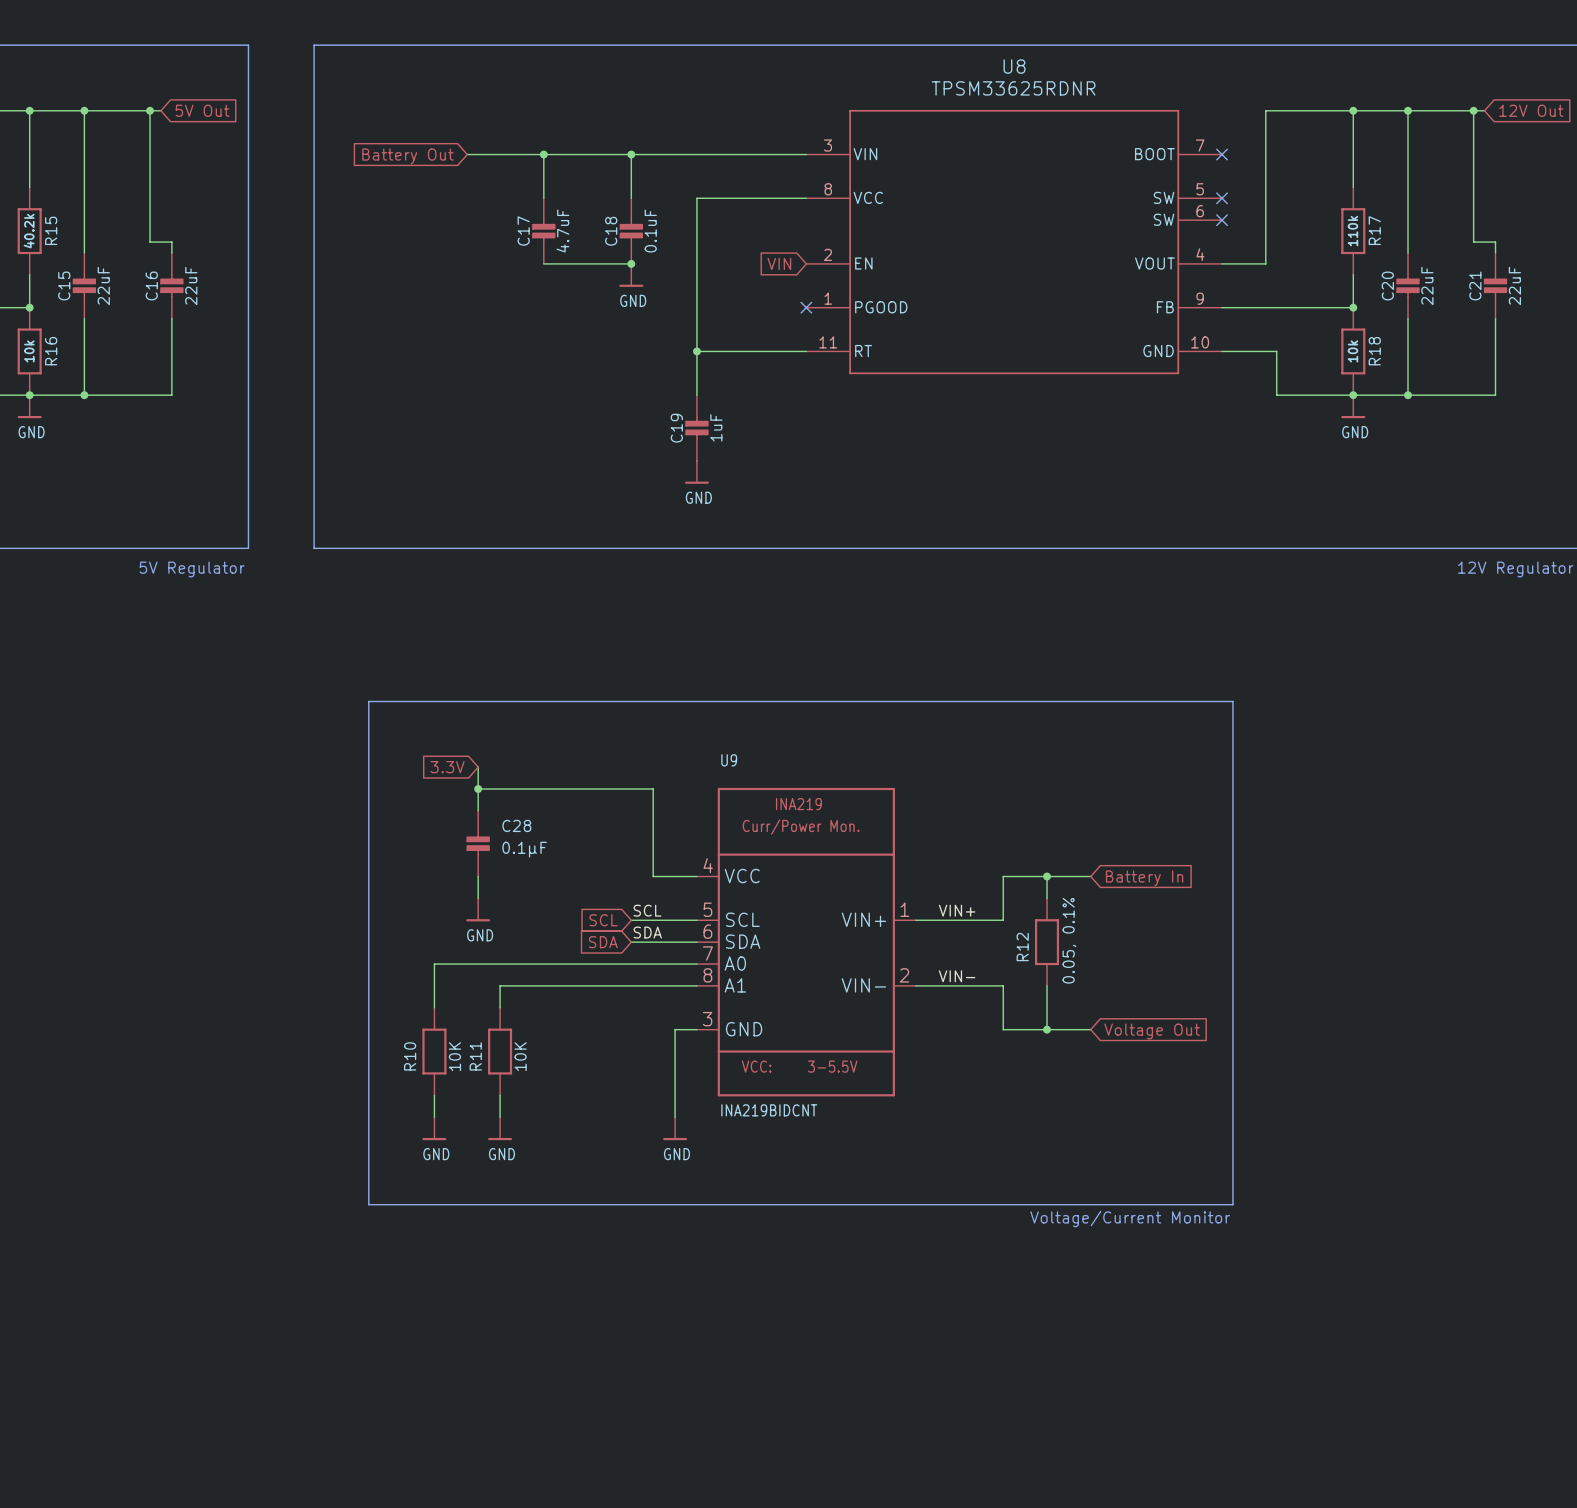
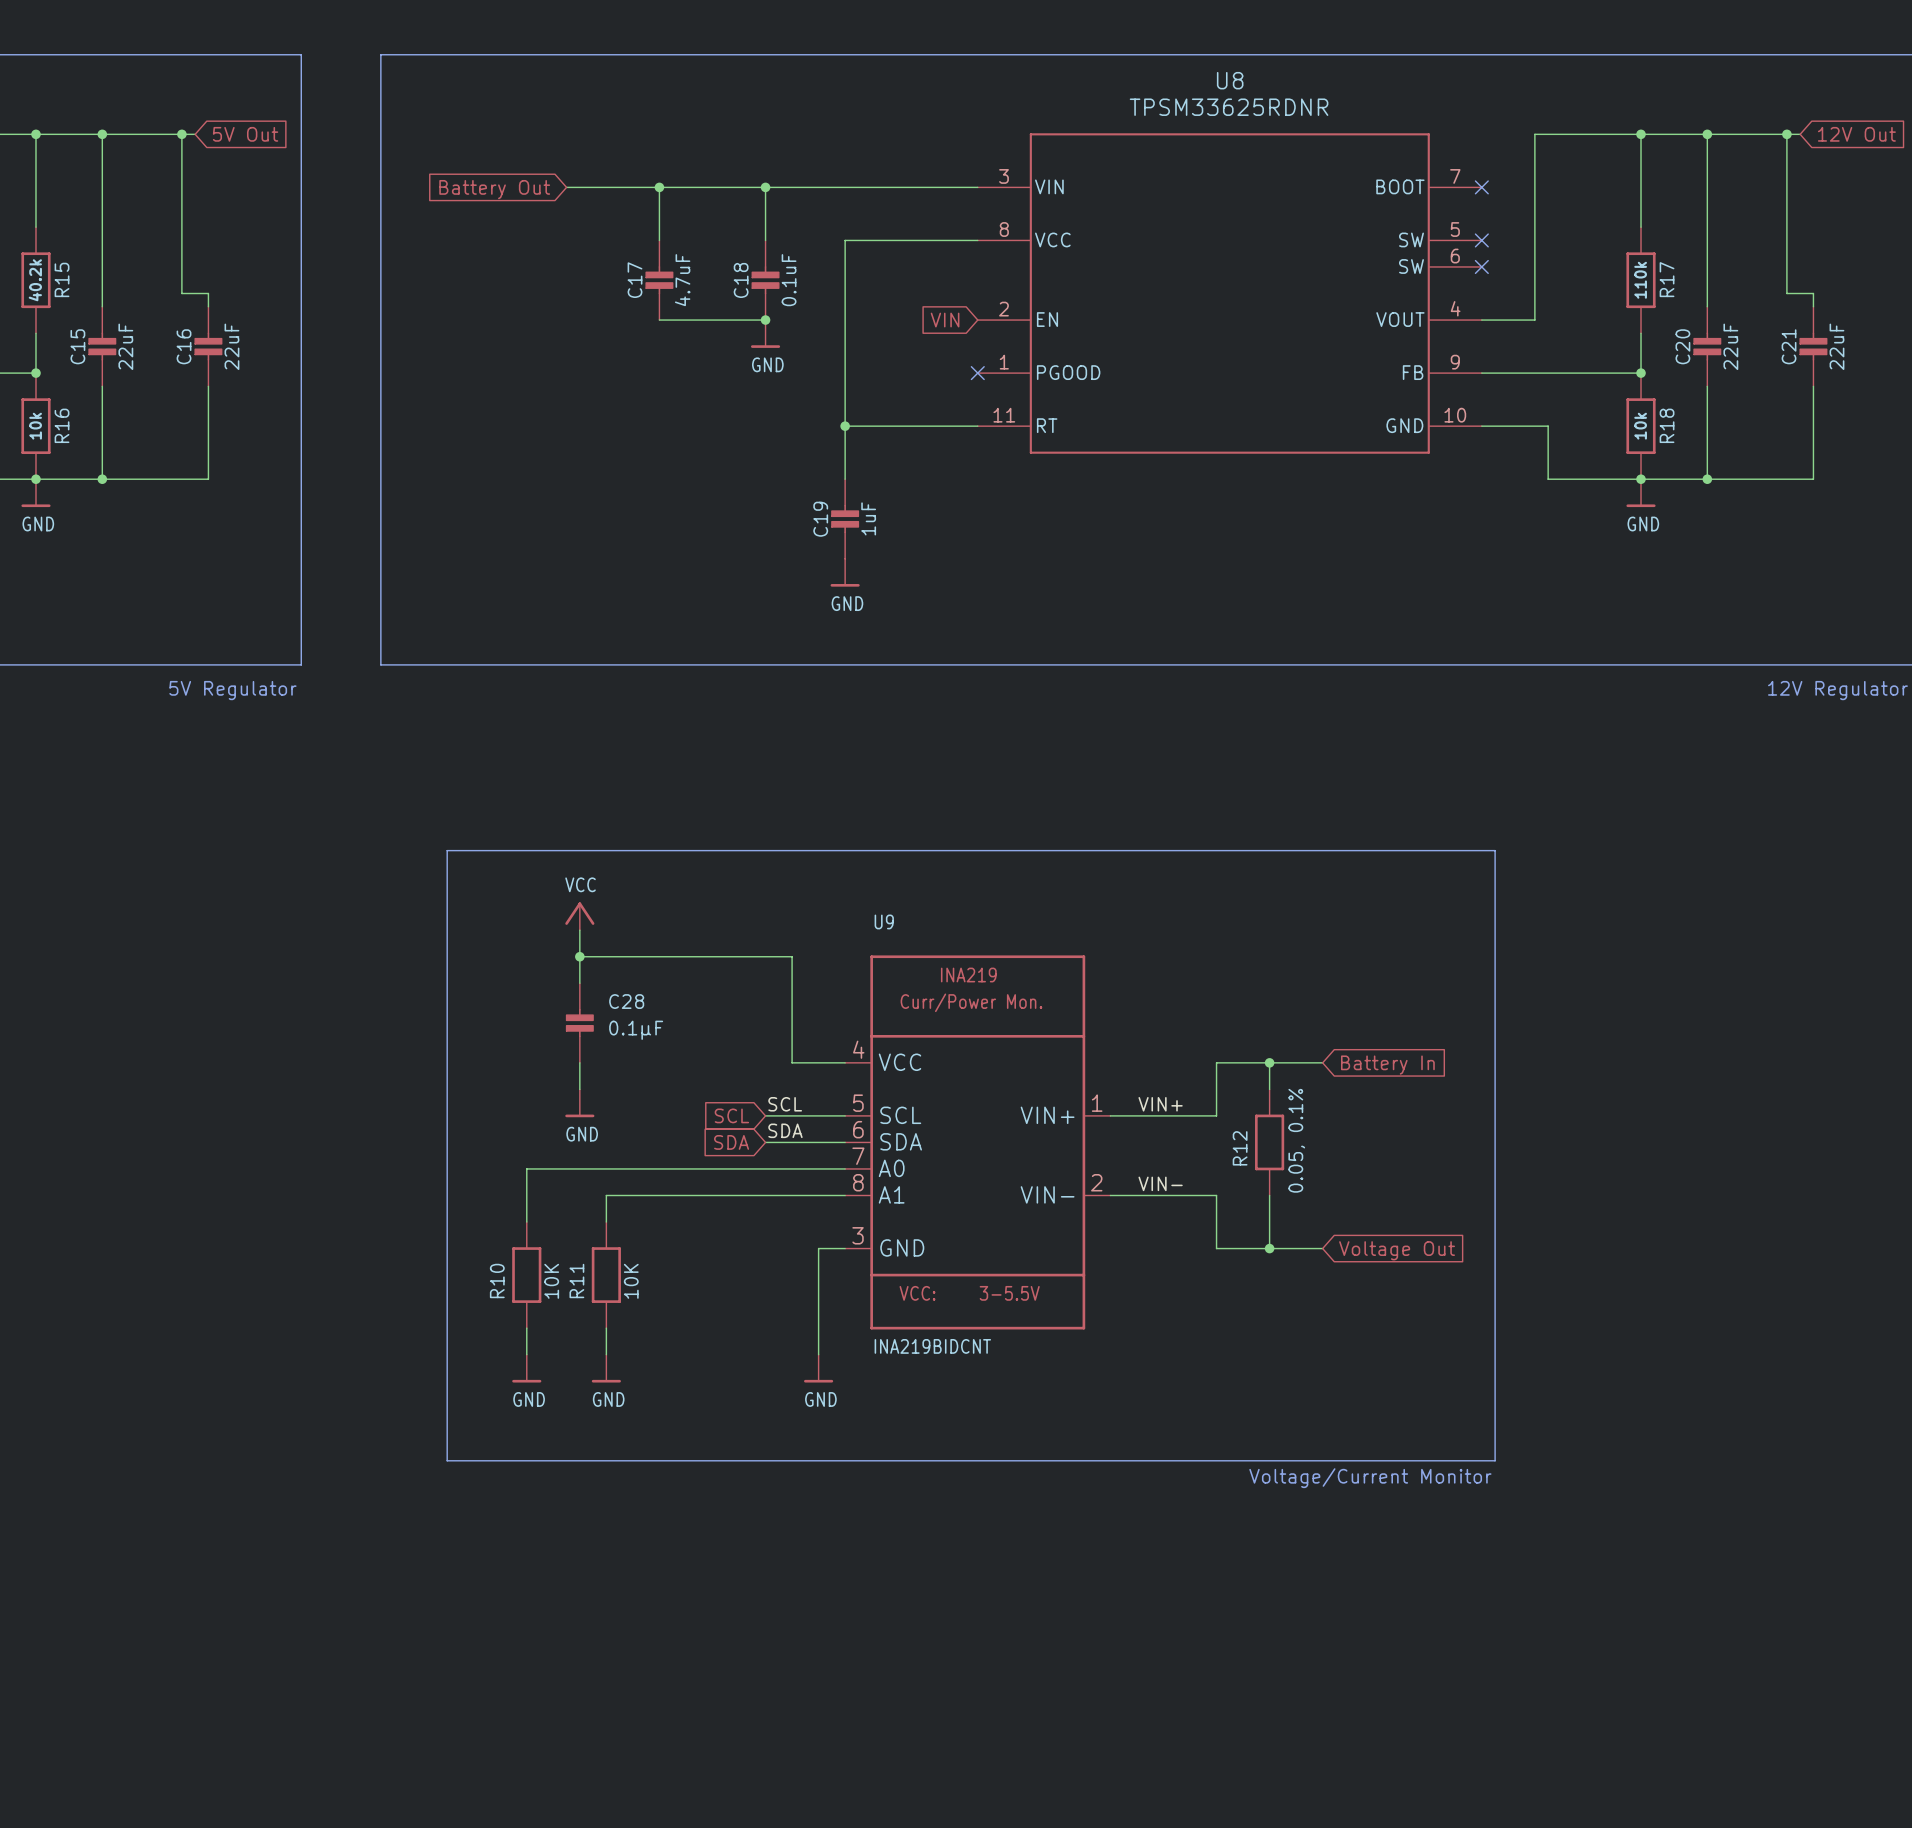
power symbol: none -> VCC (579, 916)
global label: 3.3V (447, 767) -> none

